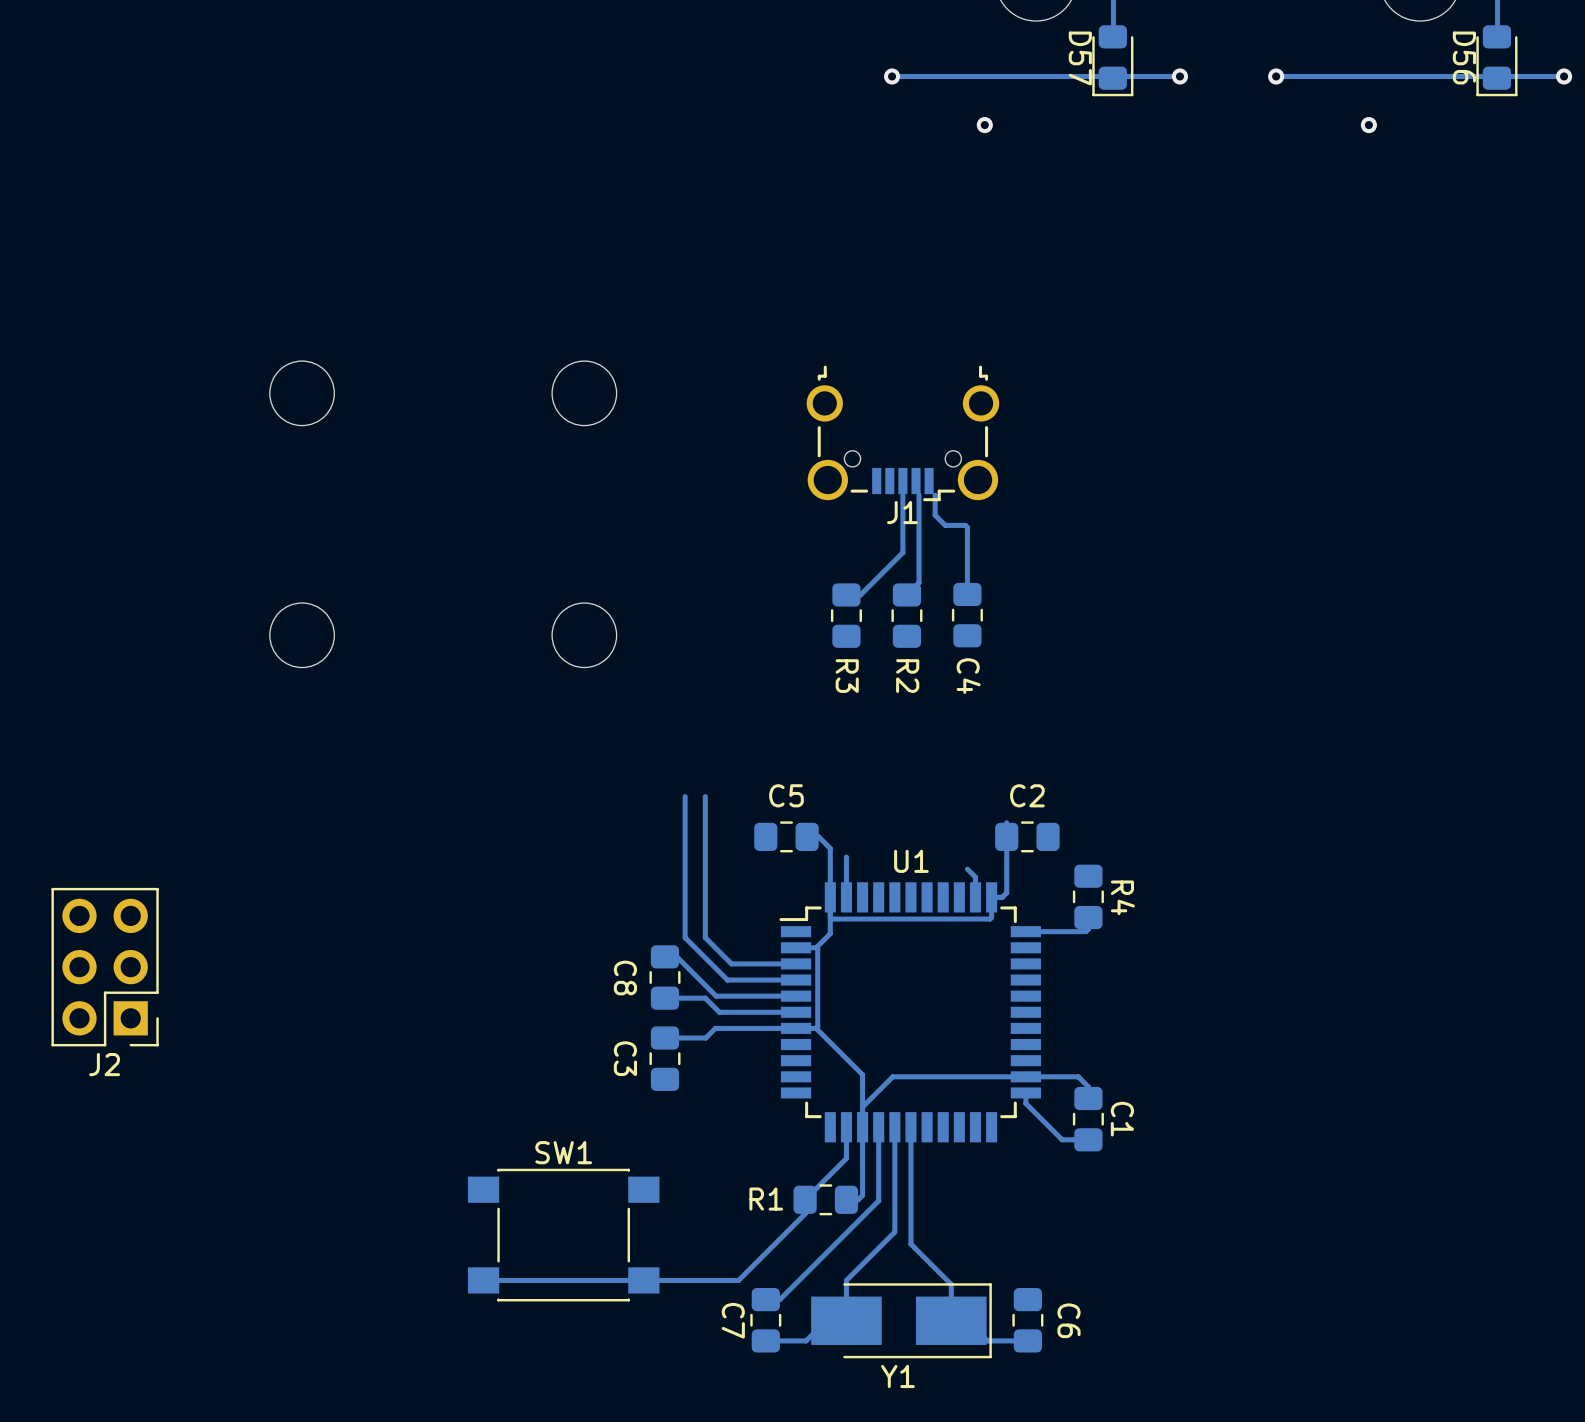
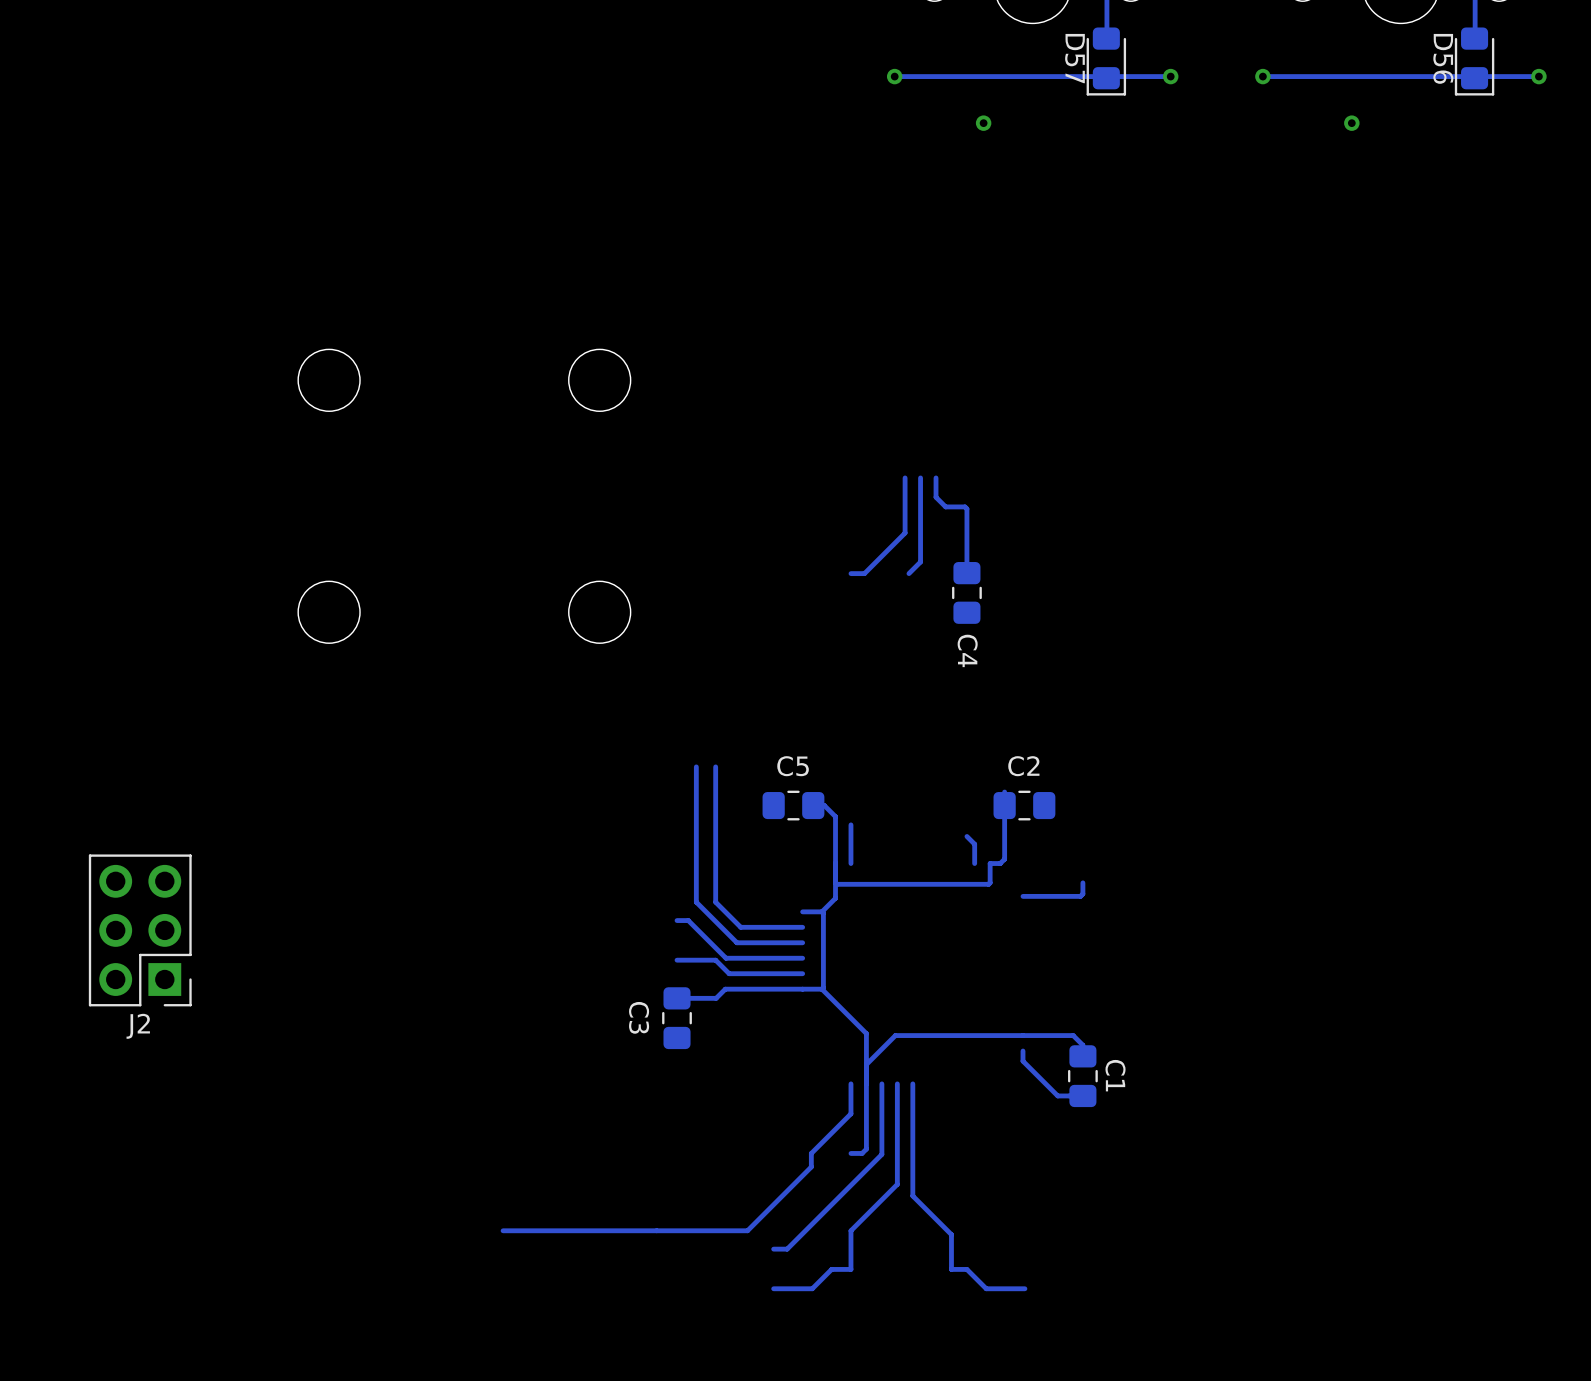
J1: (902, 433) -> none
R3: (846, 615) -> none
R2: (906, 615) -> none
R4: (1088, 896) -> none
C8: (664, 977) -> none
U1: (910, 1012) -> none
R1: (825, 1199) -> none
SW1: (563, 1235) -> none
C7: (765, 1320) -> none
Y1: (901, 1320) -> none
C6: (1027, 1320) -> none

